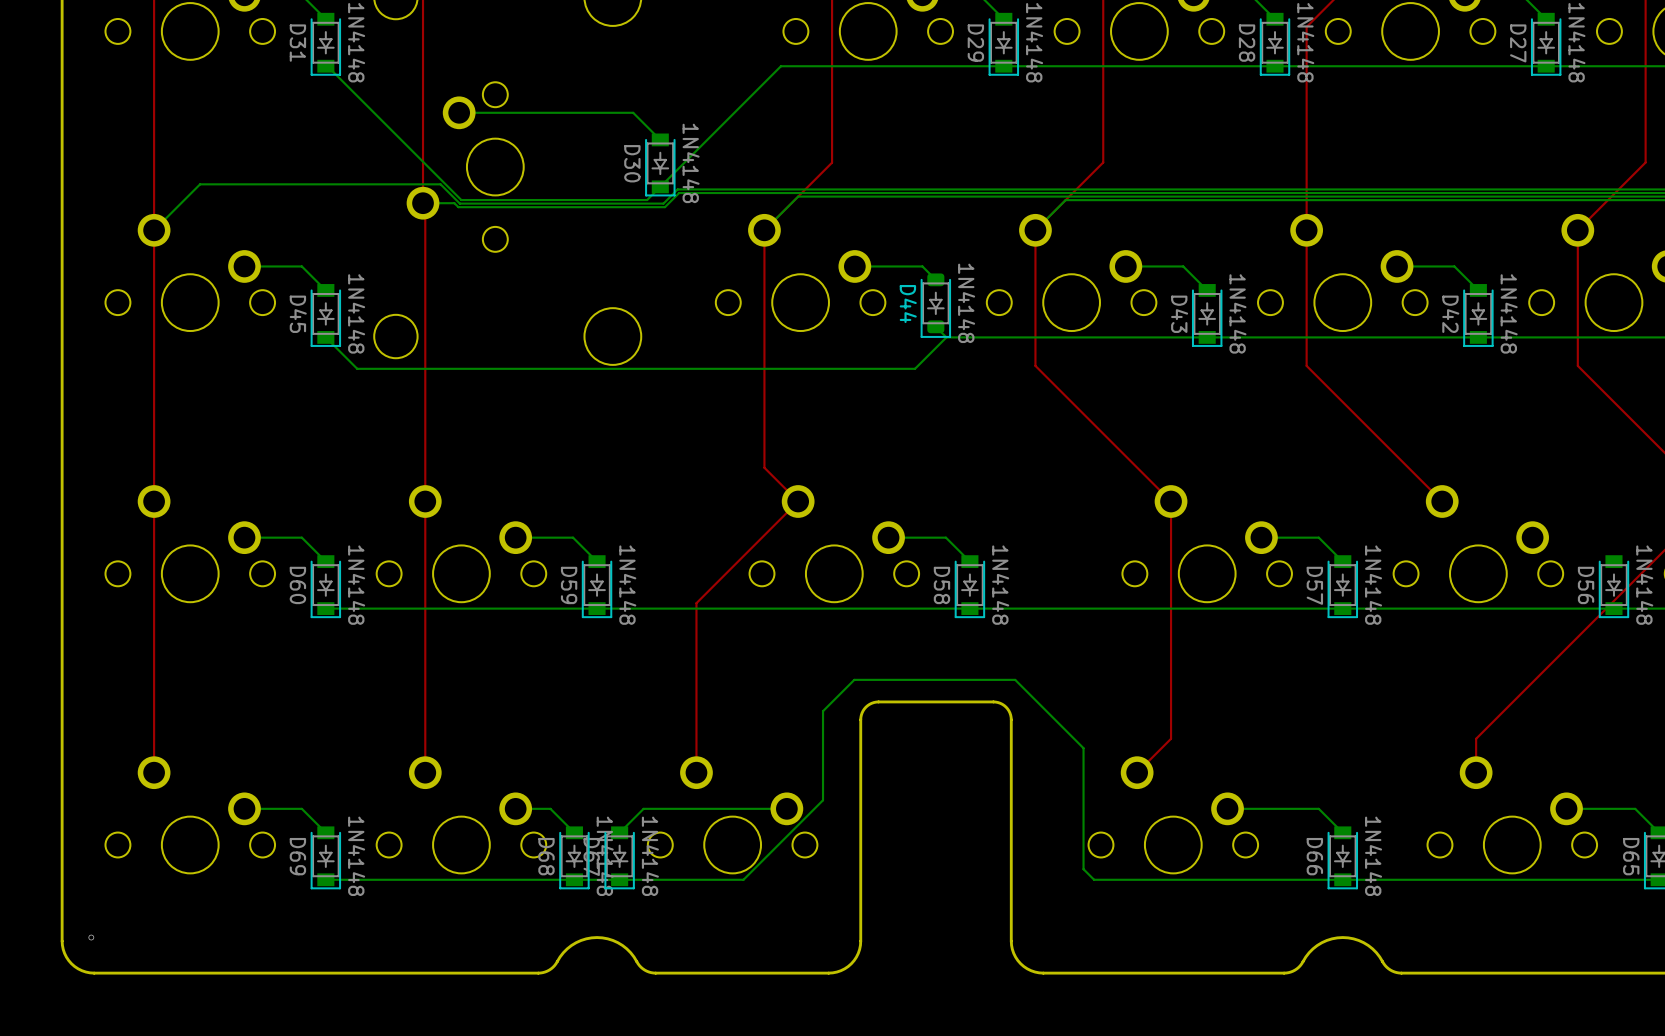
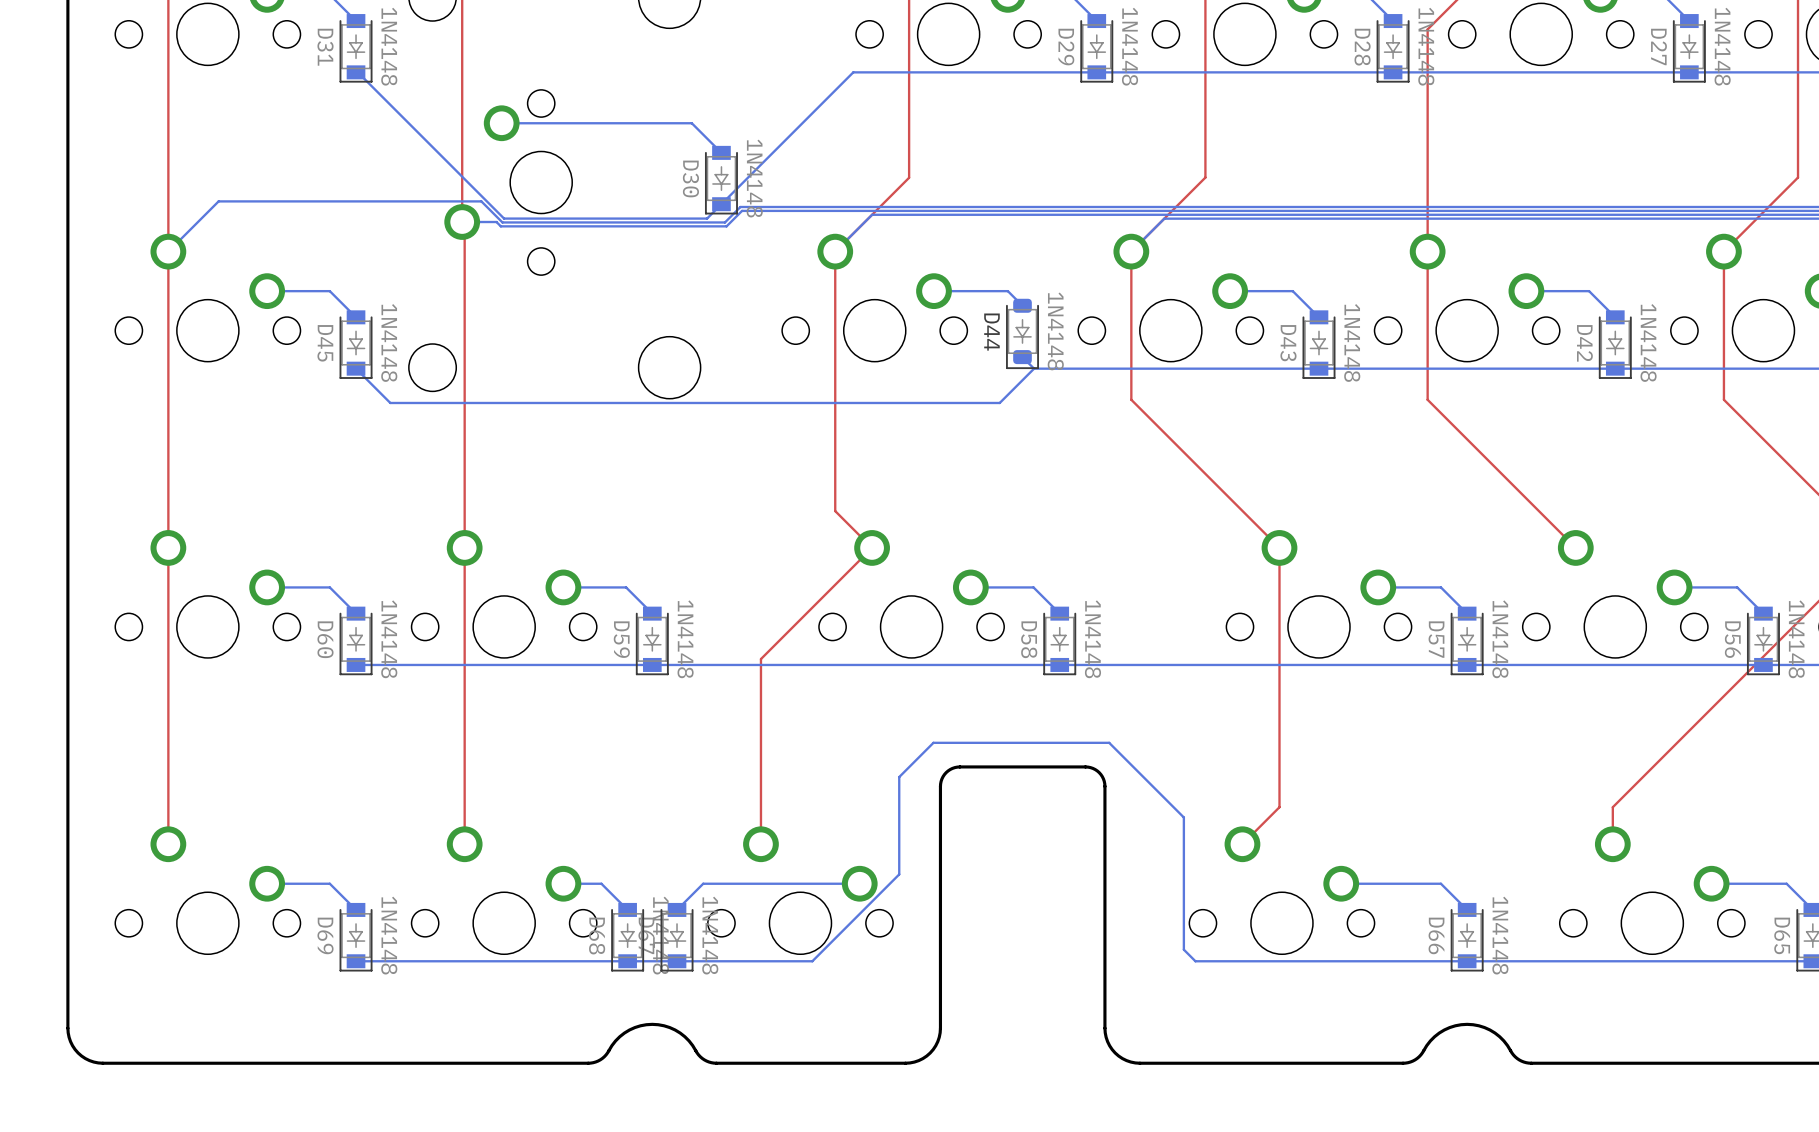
bottom track: none -> (1674, 587) (1737, 587) (1763, 613)
via: (91, 937) -> none

